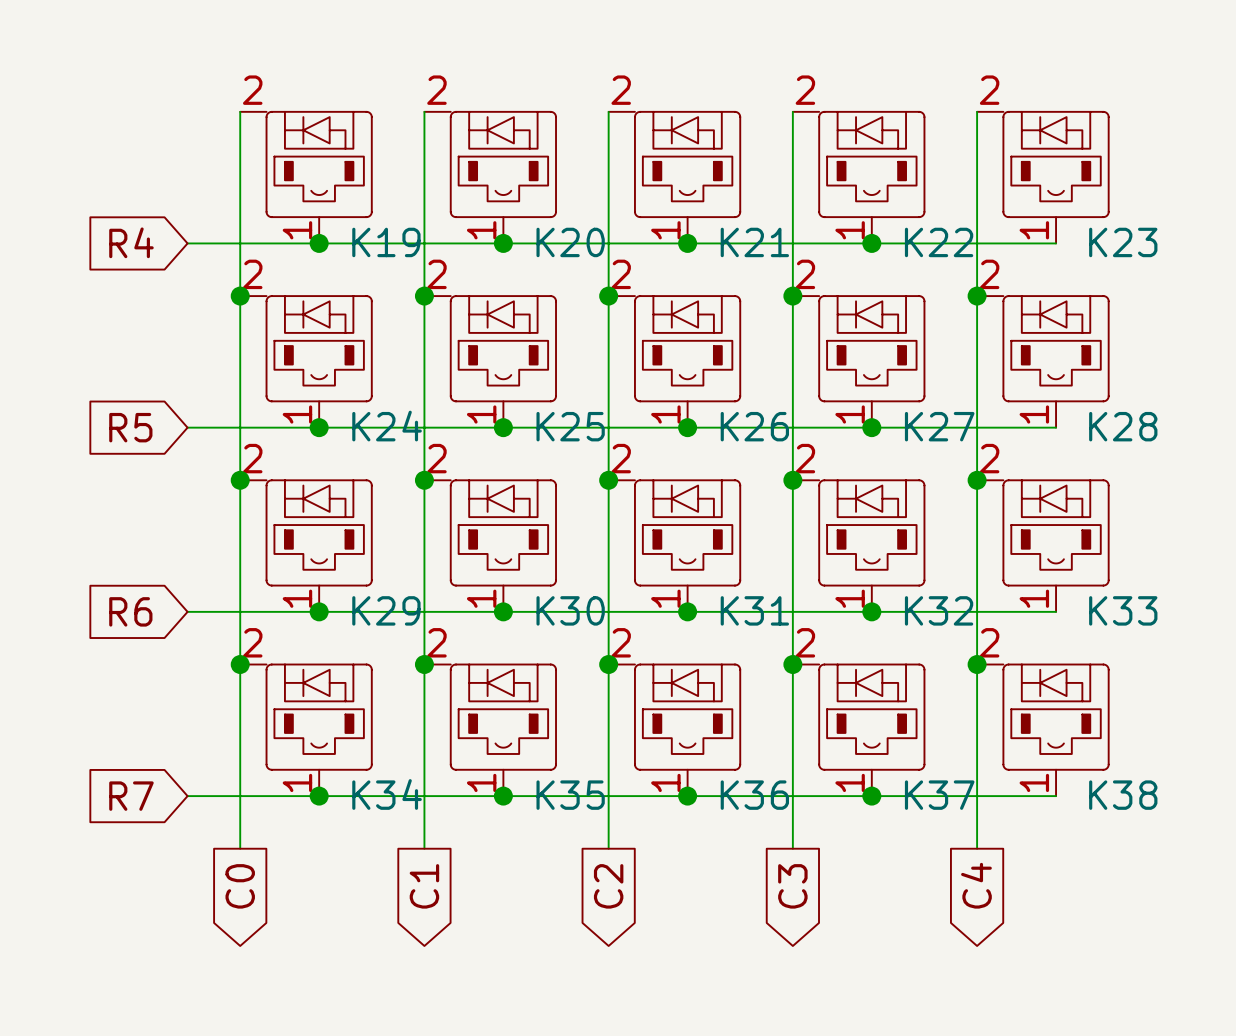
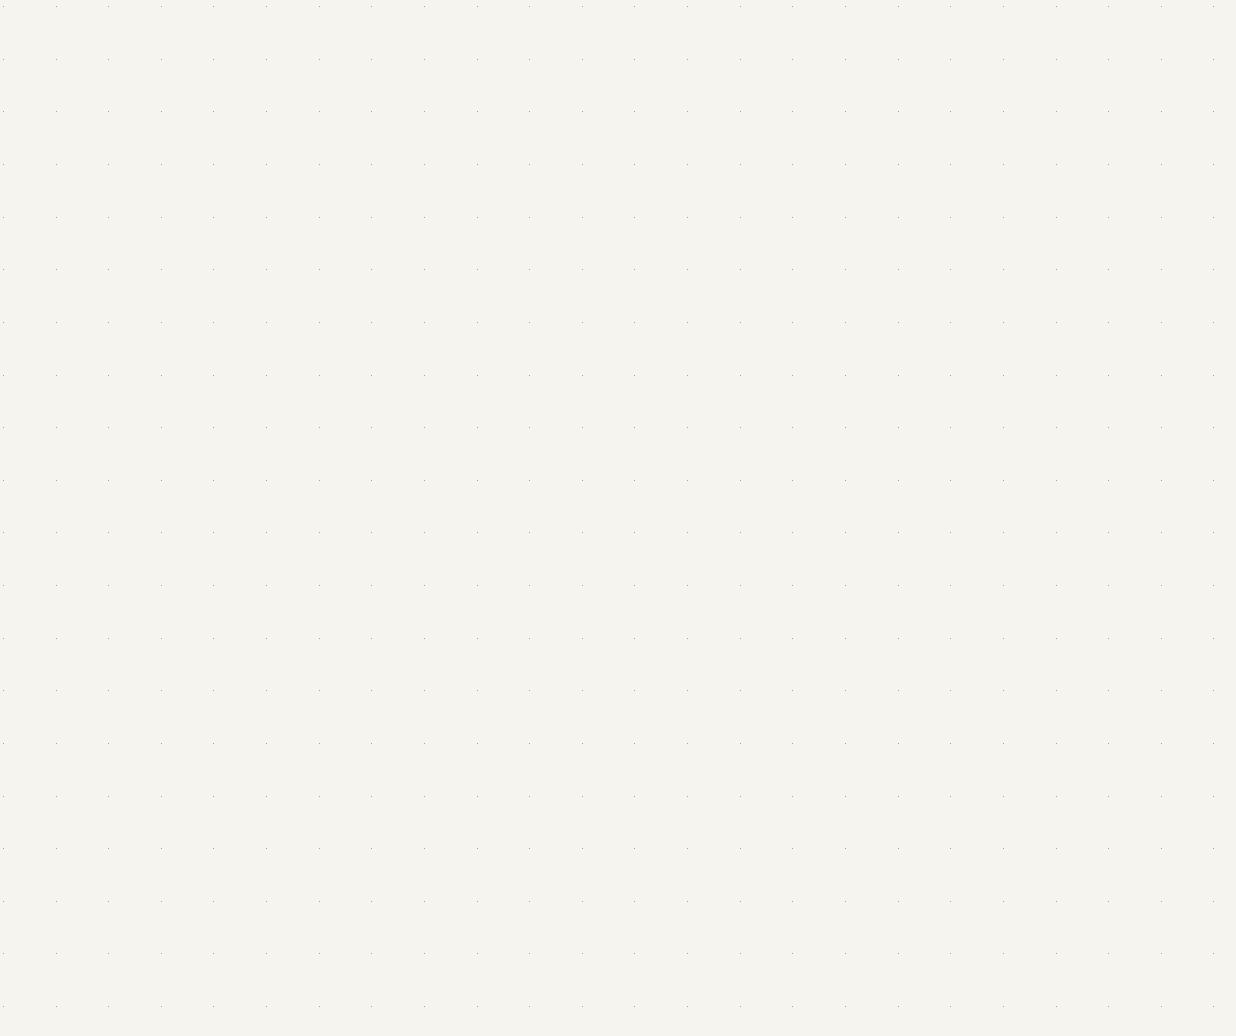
wire: (240, 111) (240, 848) -> none
wire: (424, 111) (424, 848) -> none
wire: (608, 111) (608, 848) -> none
wire: (792, 111) (792, 848) -> none
wire: (977, 111) (977, 848) -> none
K19: (306, 177) -> none
K20: (490, 177) -> none
K21: (674, 177) -> none
K22: (858, 177) -> none
K23: (1042, 177) -> none
global label: R4 (131, 242) -> none
wire: (187, 243) (1056, 243) -> none
junction: (319, 243) -> none
junction: (503, 243) -> none
junction: (687, 243) -> none
junction: (871, 243) -> none
junction: (240, 296) -> none
junction: (424, 296) -> none
junction: (608, 296) -> none
junction: (792, 296) -> none
junction: (977, 296) -> none
K24: (306, 361) -> none
K25: (490, 361) -> none
K26: (674, 361) -> none
K27: (858, 361) -> none
K28: (1042, 361) -> none
global label: R5 (130, 427) -> none
wire: (187, 427) (1056, 427) -> none
junction: (319, 427) -> none
junction: (503, 427) -> none
junction: (687, 427) -> none
junction: (871, 427) -> none
junction: (240, 480) -> none
junction: (424, 480) -> none
junction: (608, 480) -> none
junction: (792, 480) -> none
junction: (977, 480) -> none
K29: (306, 546) -> none
K30: (490, 546) -> none
K31: (674, 546) -> none
K32: (858, 546) -> none
K33: (1042, 546) -> none
global label: R6 (130, 611) -> none
wire: (187, 611) (1056, 611) -> none
junction: (319, 611) -> none
junction: (503, 611) -> none
junction: (687, 611) -> none
junction: (871, 611) -> none
junction: (240, 664) -> none
junction: (424, 664) -> none
junction: (608, 664) -> none
junction: (792, 664) -> none
junction: (977, 664) -> none
K34: (306, 730) -> none
K35: (490, 730) -> none
K36: (674, 730) -> none
K37: (858, 730) -> none
K38: (1042, 730) -> none
global label: R7 (131, 796) -> none
wire: (187, 796) (1056, 796) -> none
junction: (319, 796) -> none
junction: (503, 796) -> none
junction: (687, 796) -> none
junction: (871, 796) -> none
global label: C4 (976, 885) -> none
global label: C0 (240, 886) -> none
global label: C1 (424, 886) -> none
global label: C2 (608, 886) -> none
global label: C3 (792, 886) -> none

